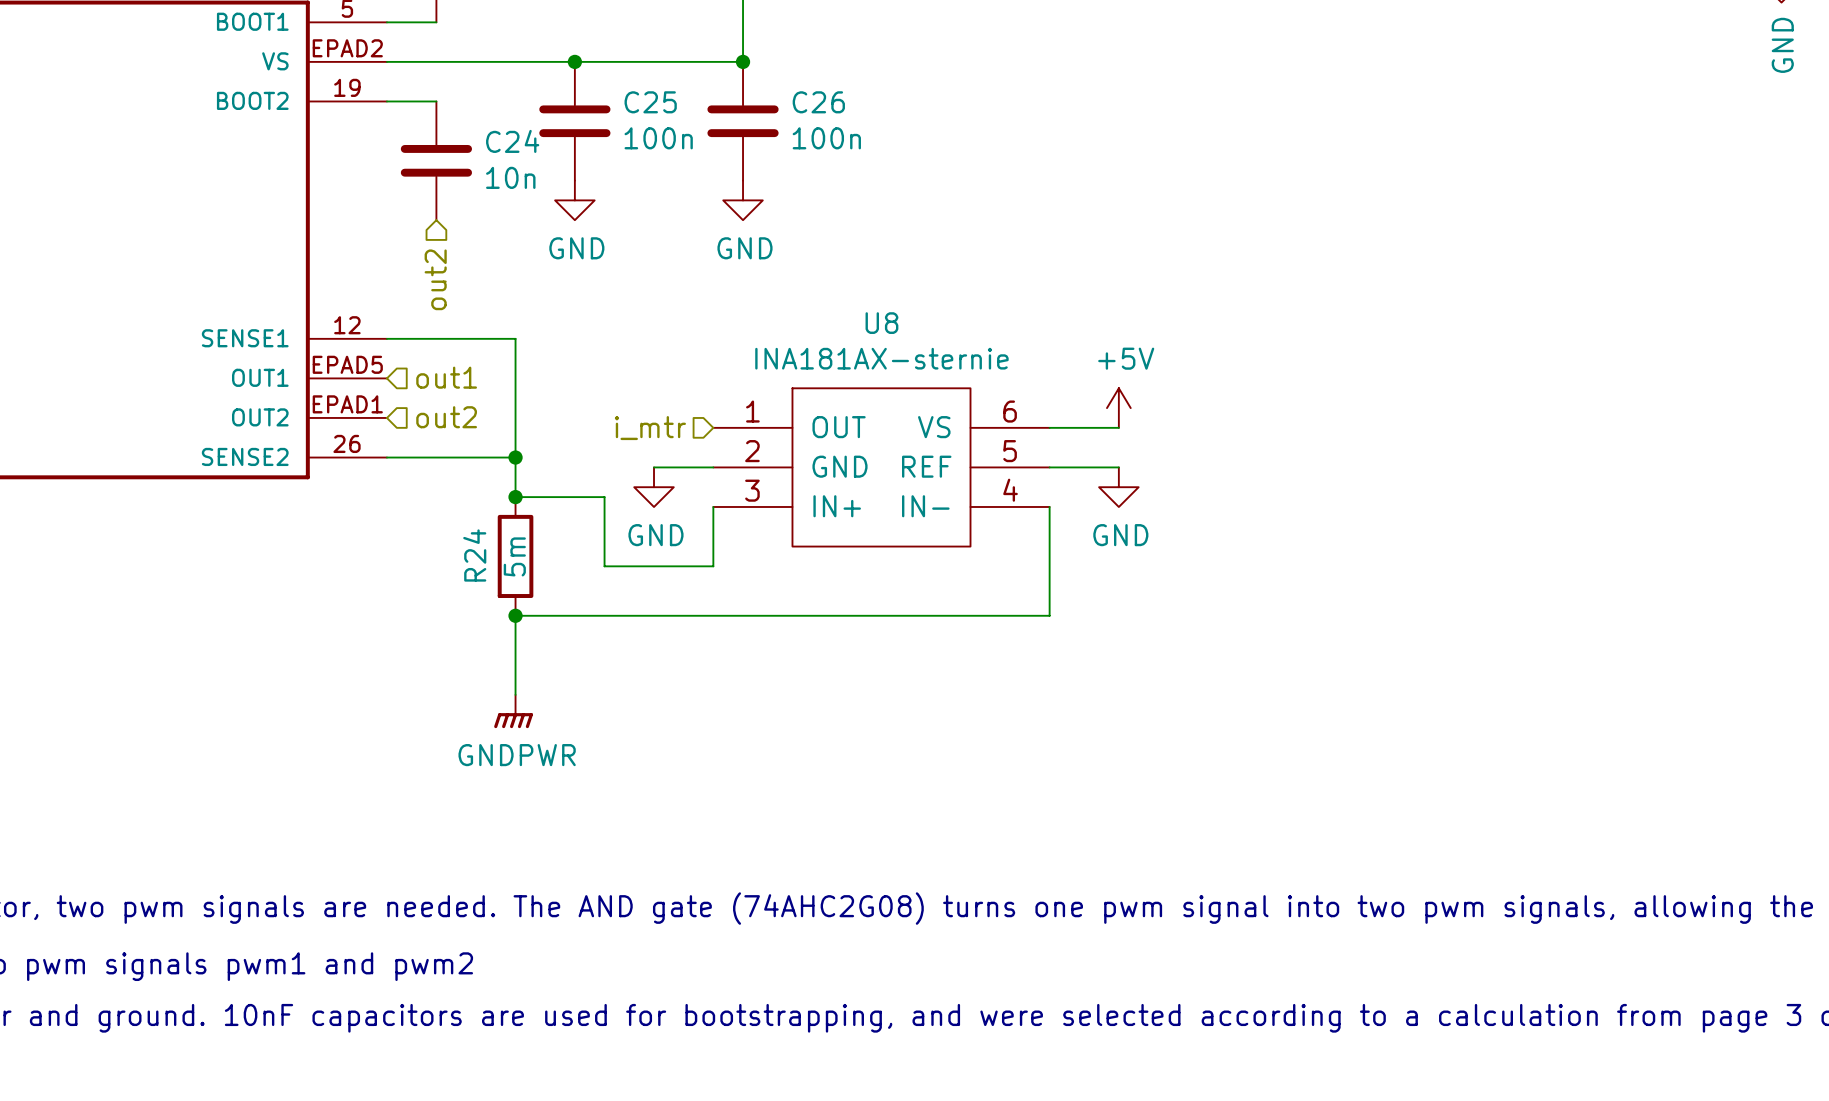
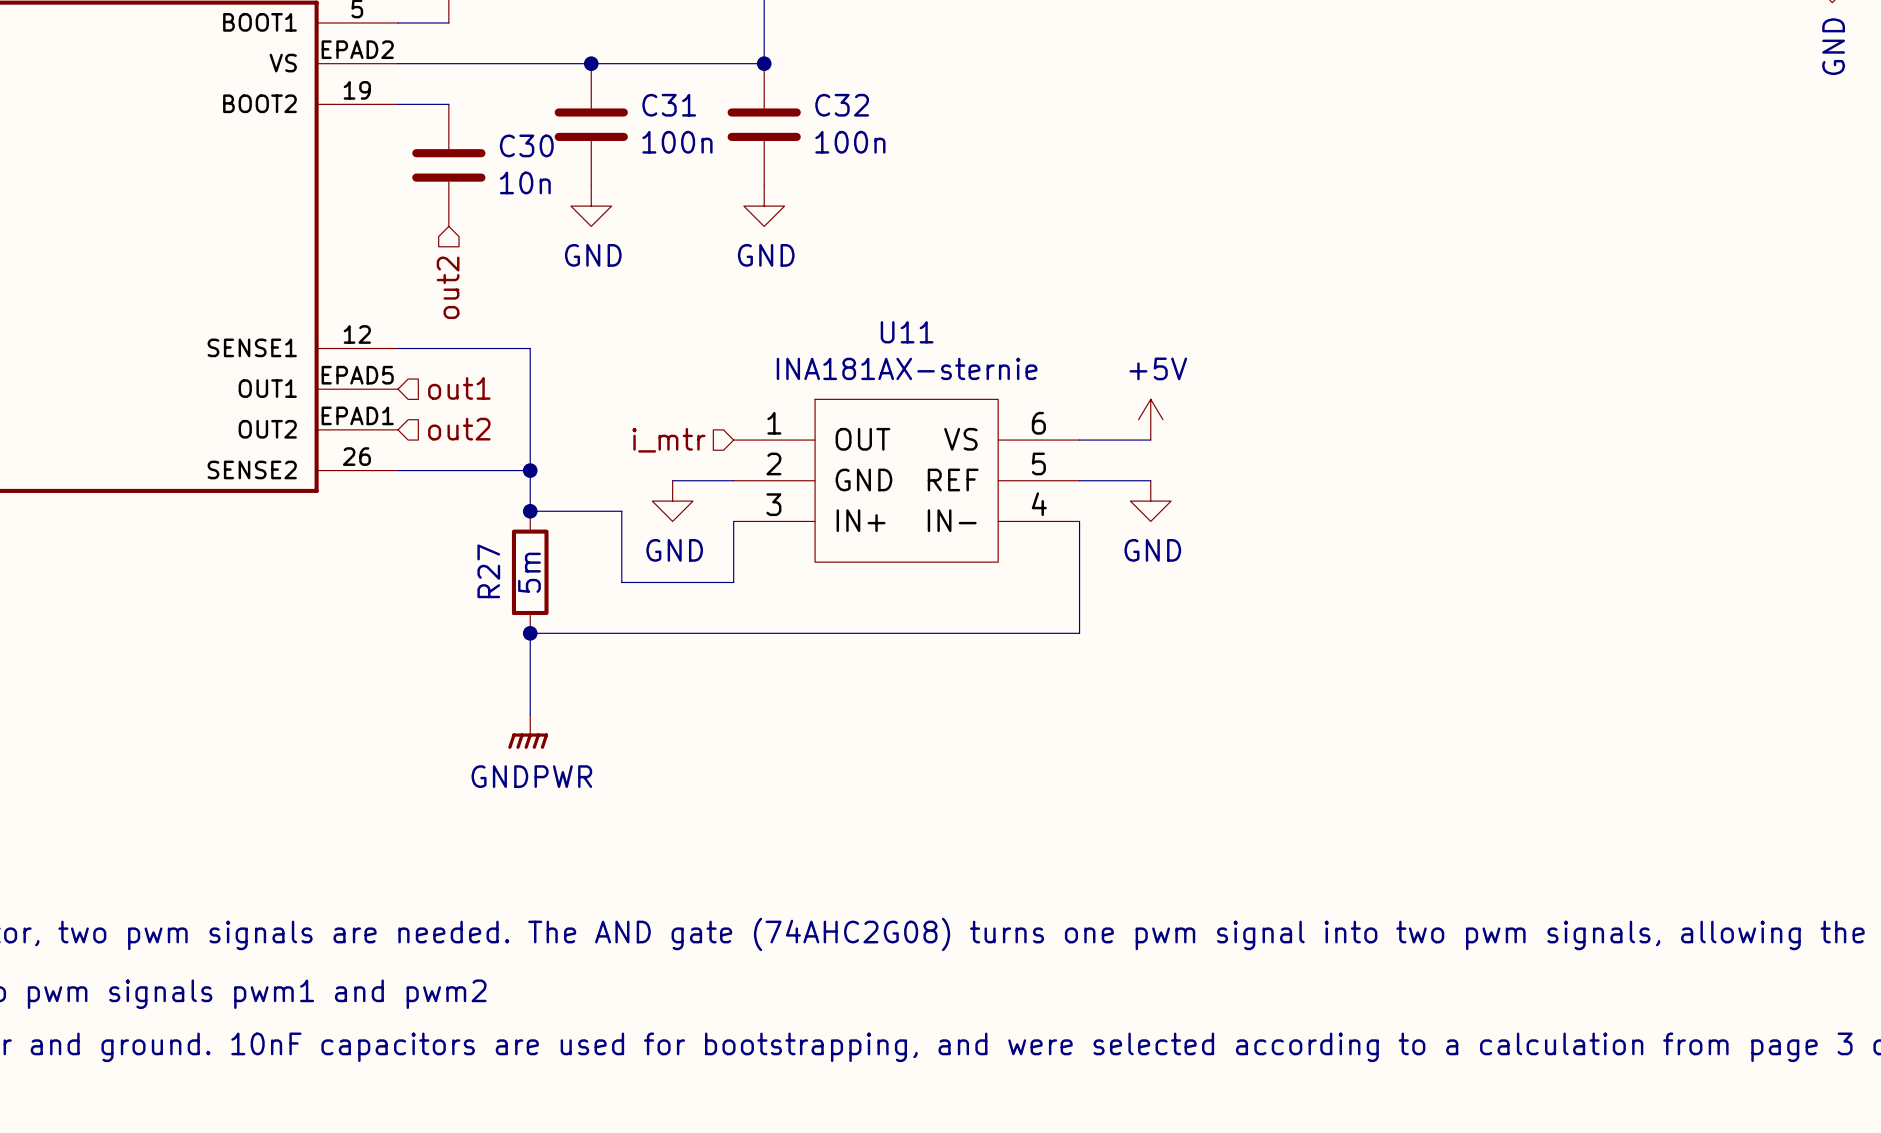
C25 name: C25 (650, 102) -> C31 (669, 105)
C26 name: C26 (818, 102) -> C32 (842, 105)
C24 name: C24 (512, 141) -> C30 (526, 145)
U8 name: U8 (881, 323) -> U11 (907, 332)
R24 name: R24 (474, 555) -> R27 (488, 571)

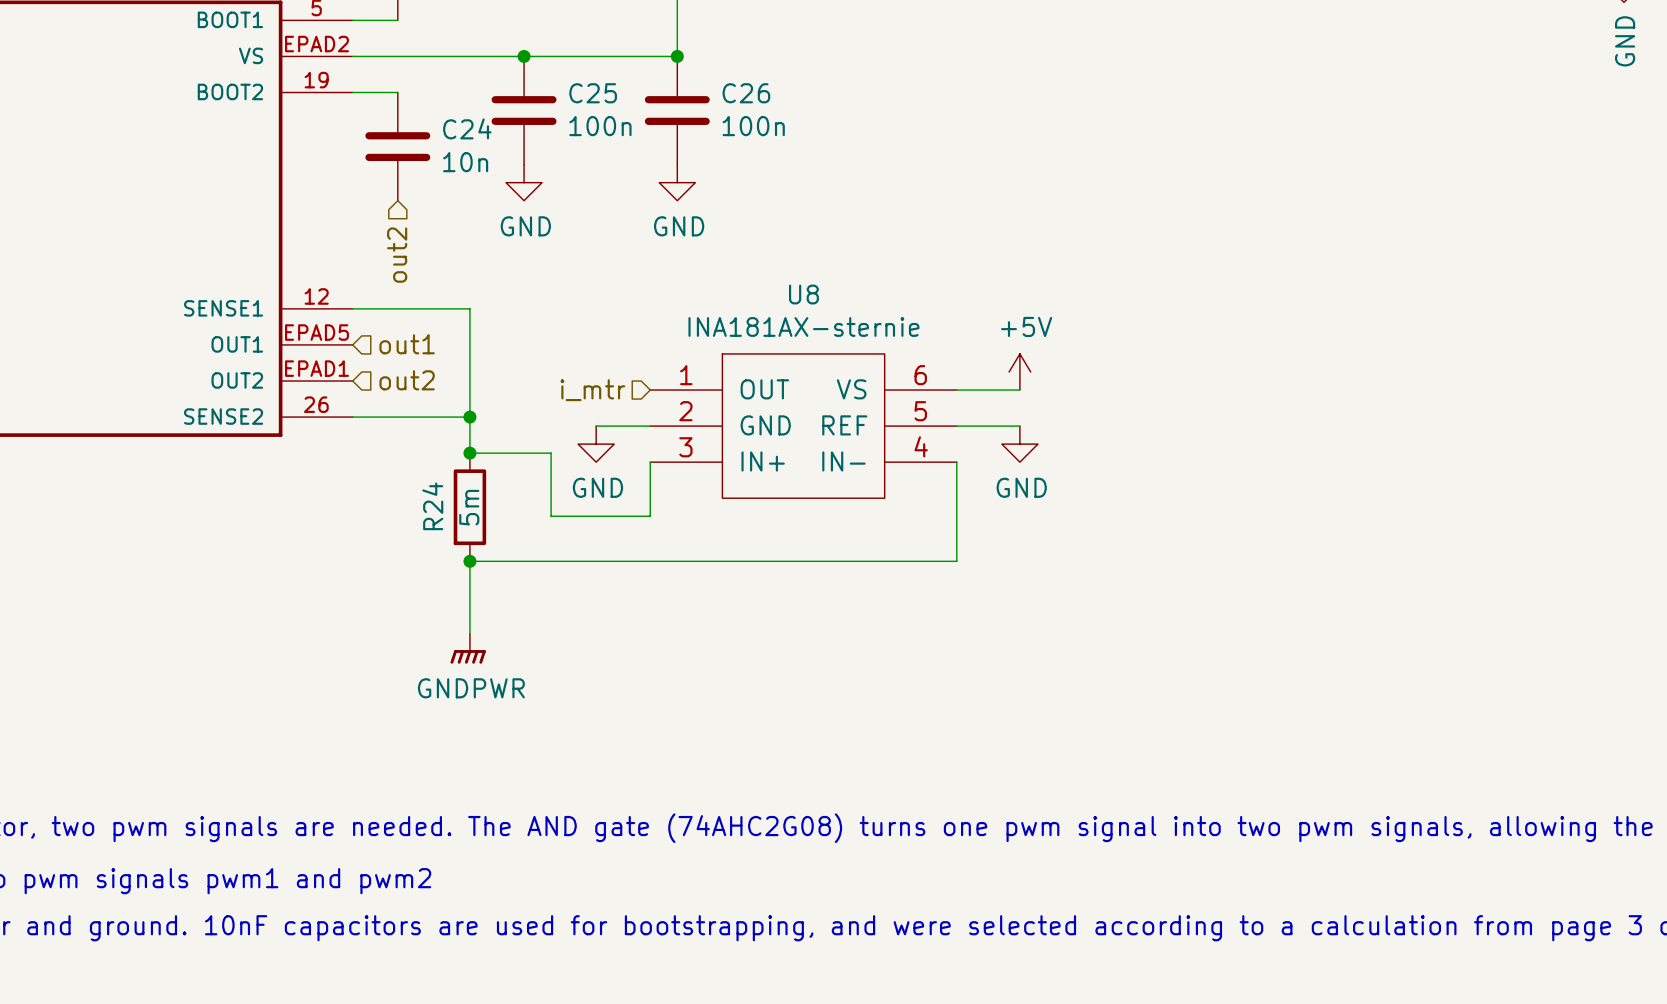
C31 name: C31 (669, 105) -> C25 (593, 93)
C32 name: C32 (842, 105) -> C26 (746, 93)
C30 name: C30 (526, 145) -> C24 (467, 128)
U11 name: U11 (907, 332) -> U8 (803, 294)
R27 name: R27 (488, 571) -> R24 (432, 506)

